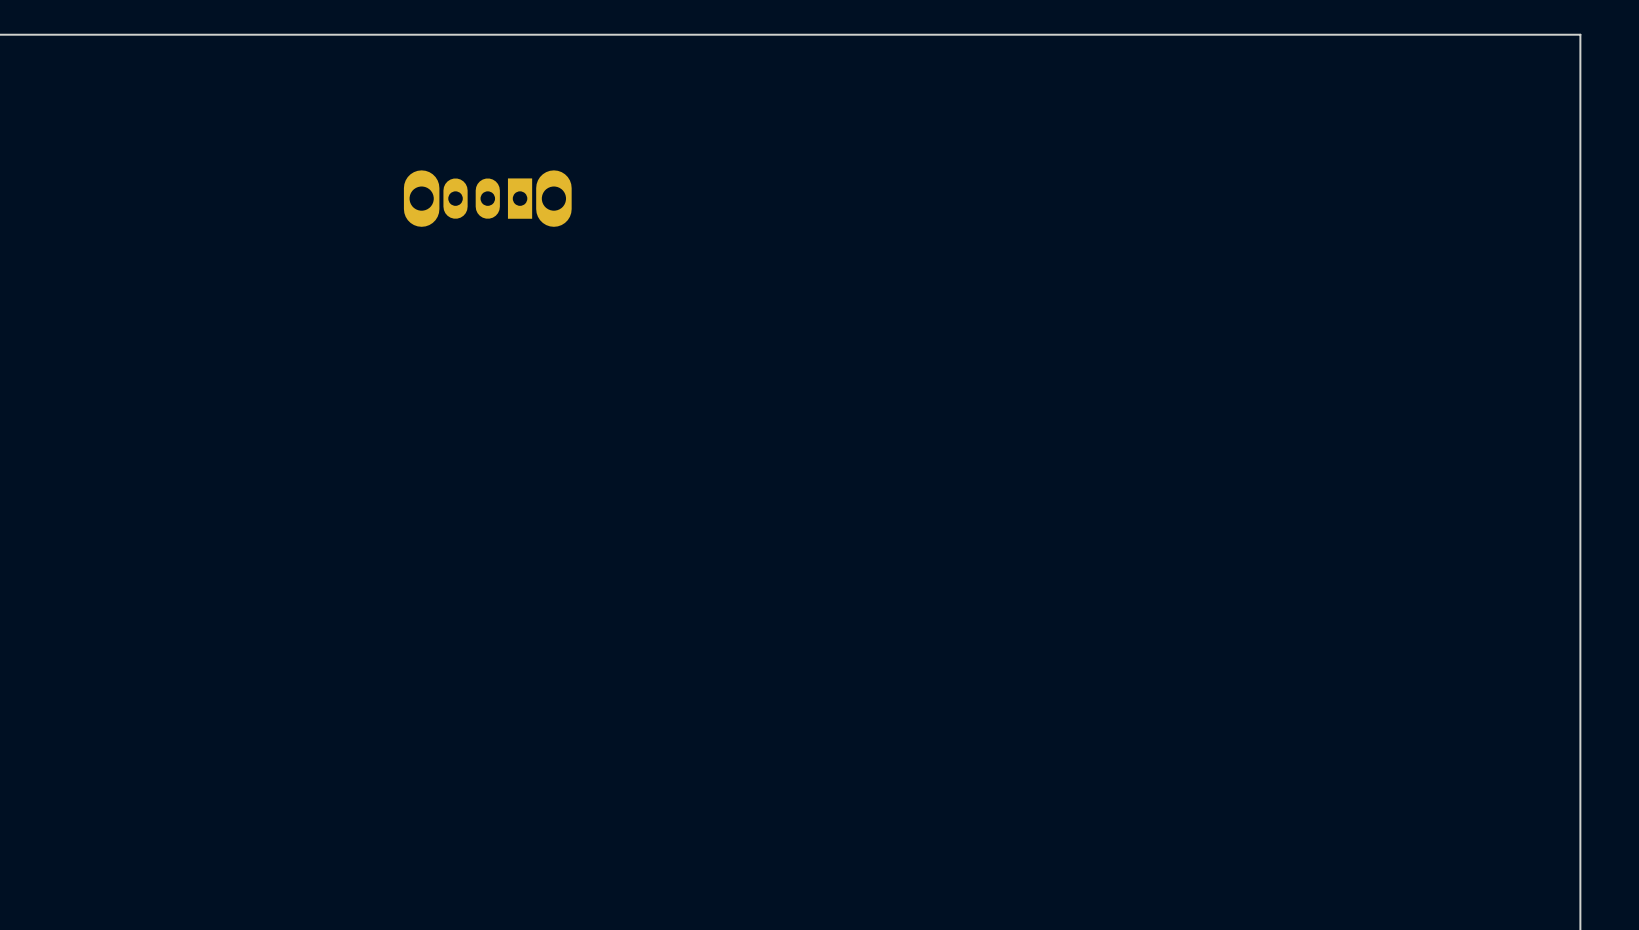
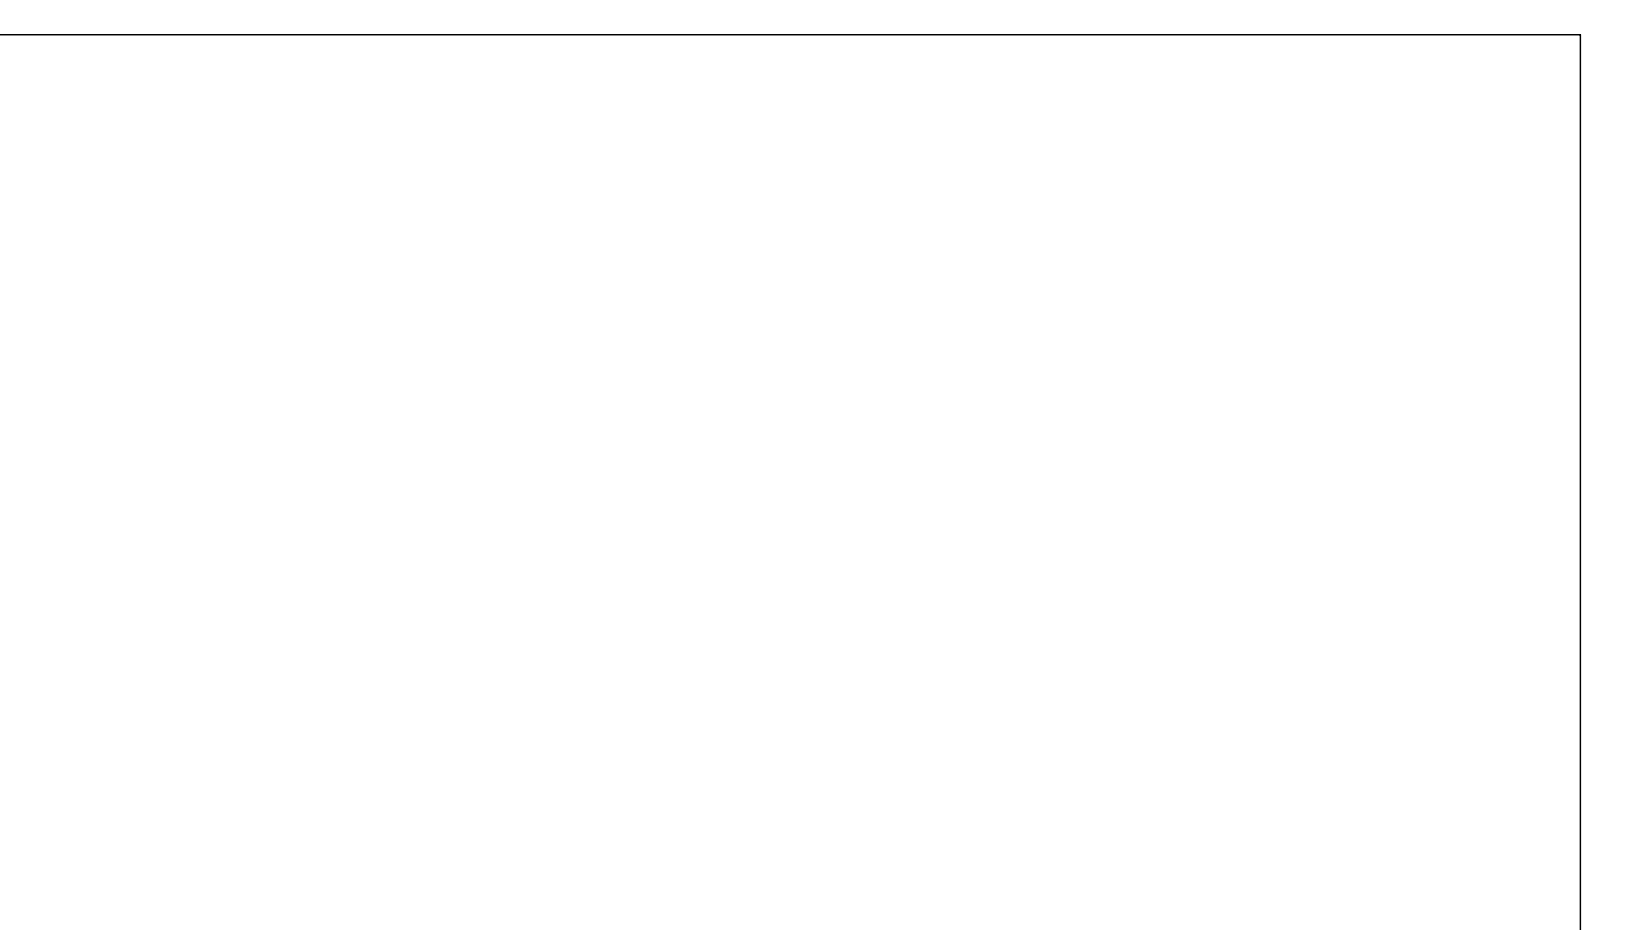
part: (487, 198) -> none

